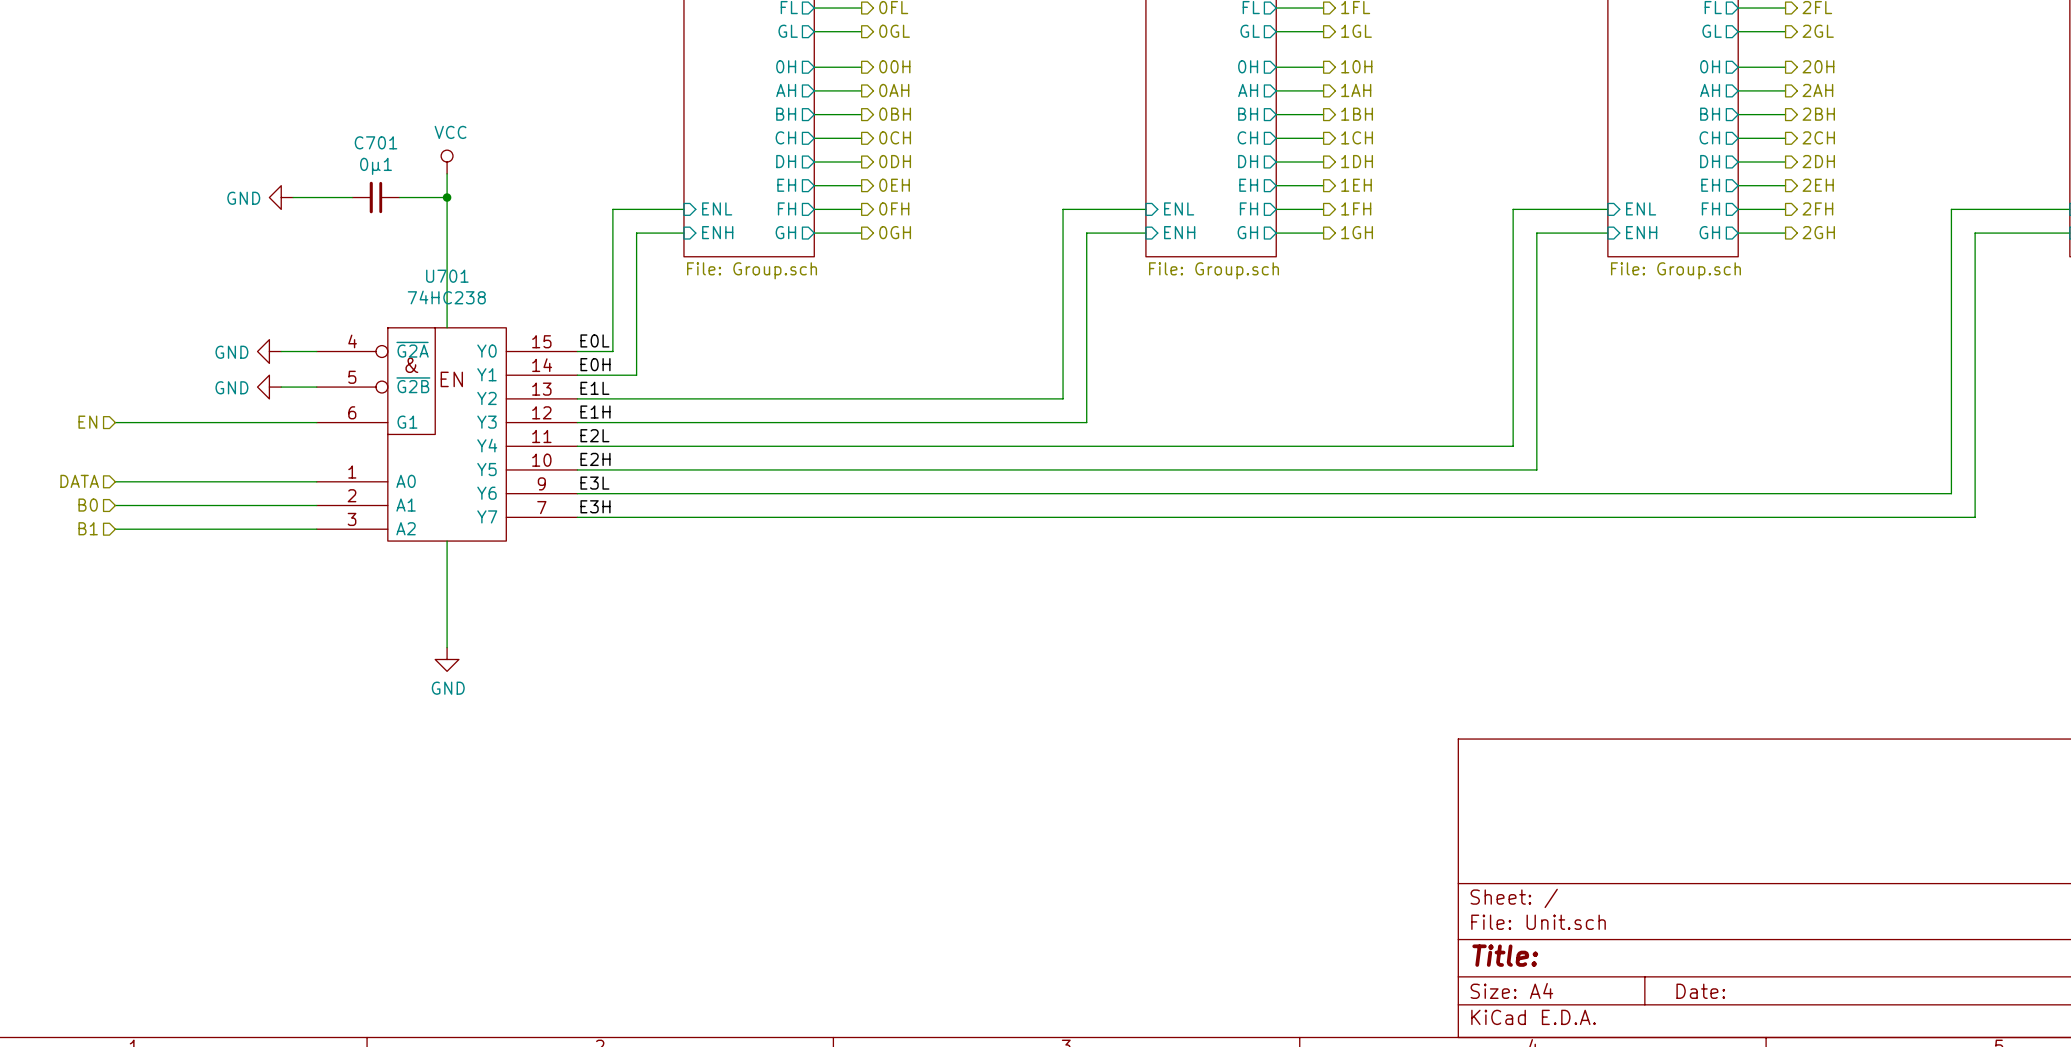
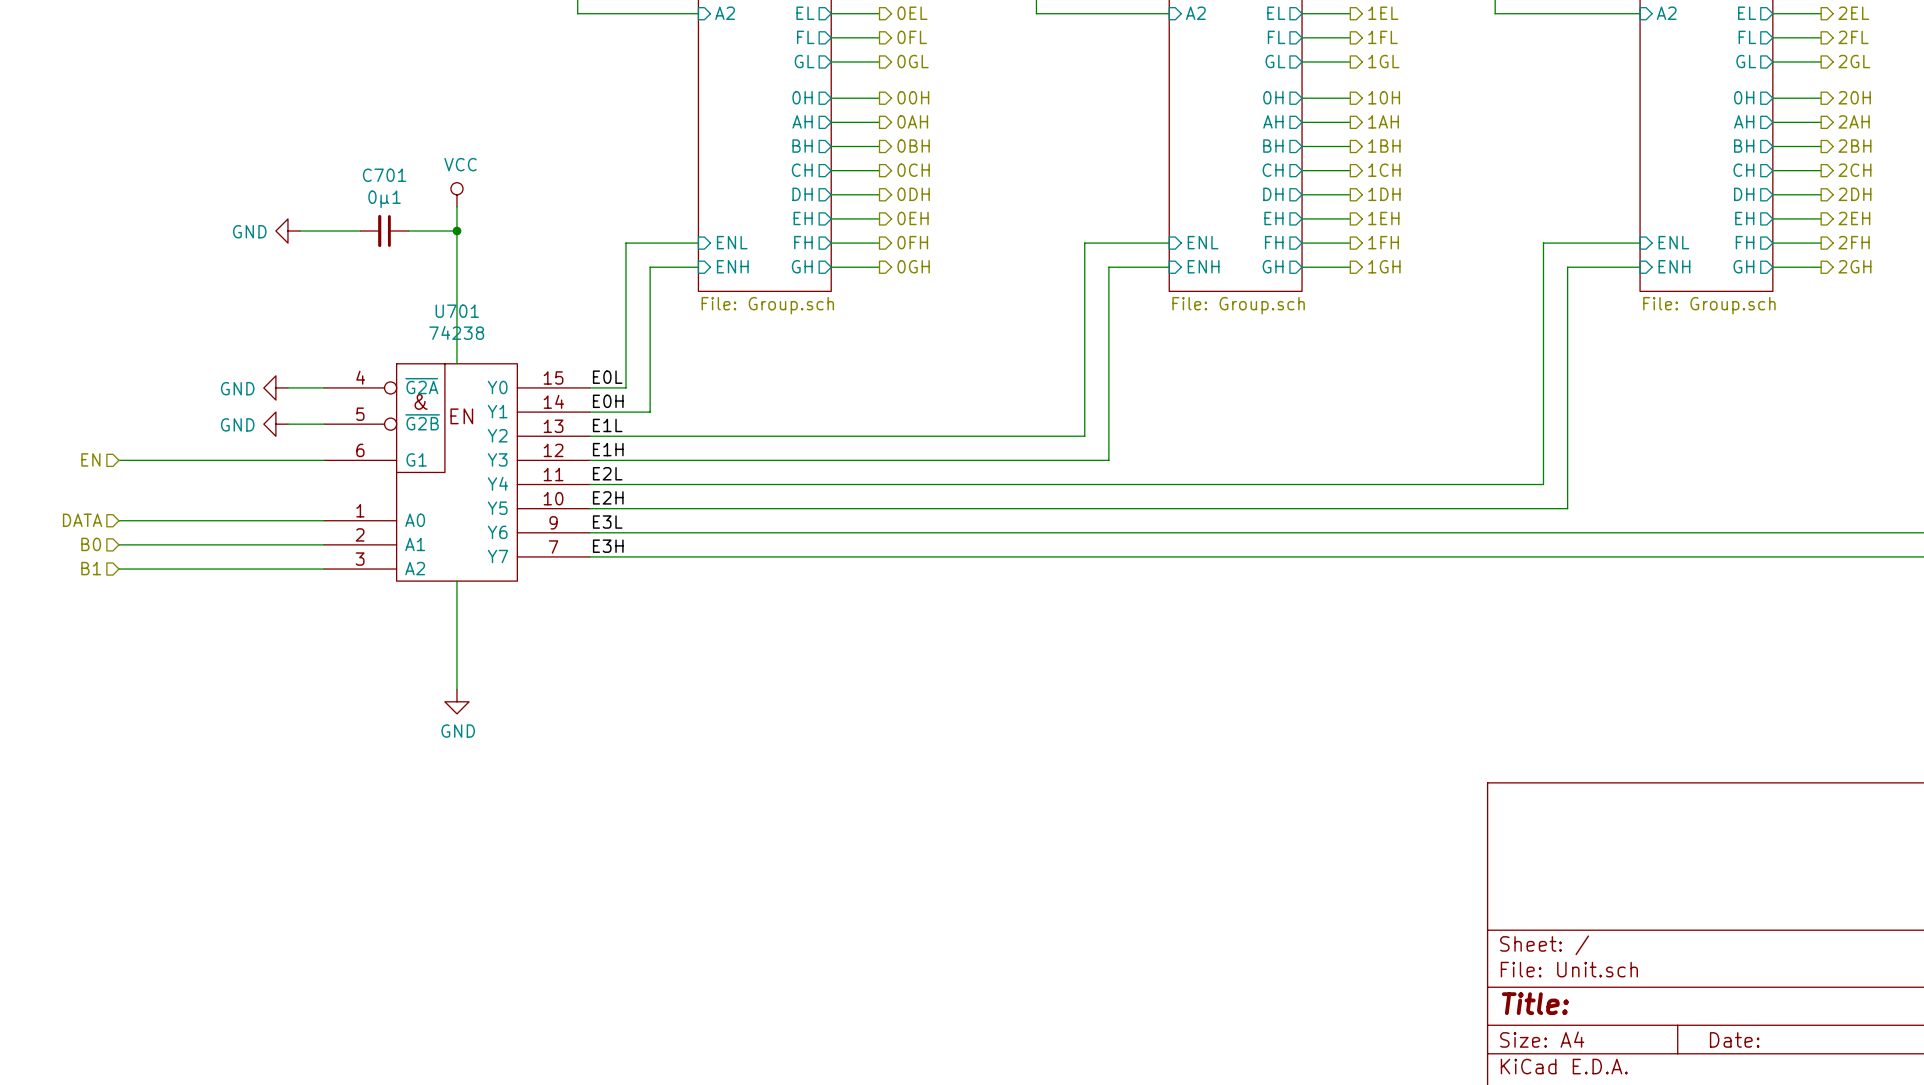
U701 value: 74HC238 (446, 297) -> 74238 (456, 332)

